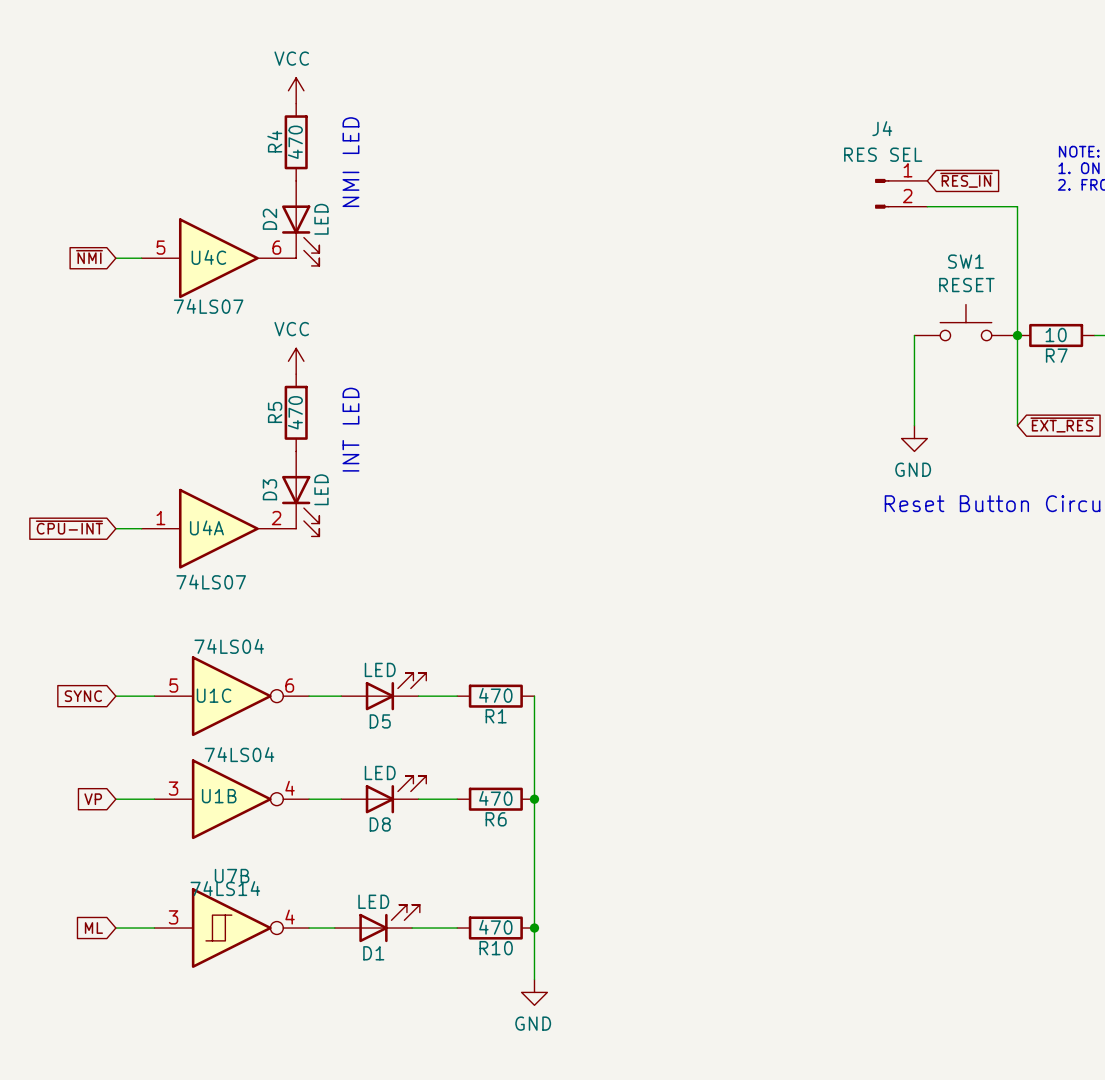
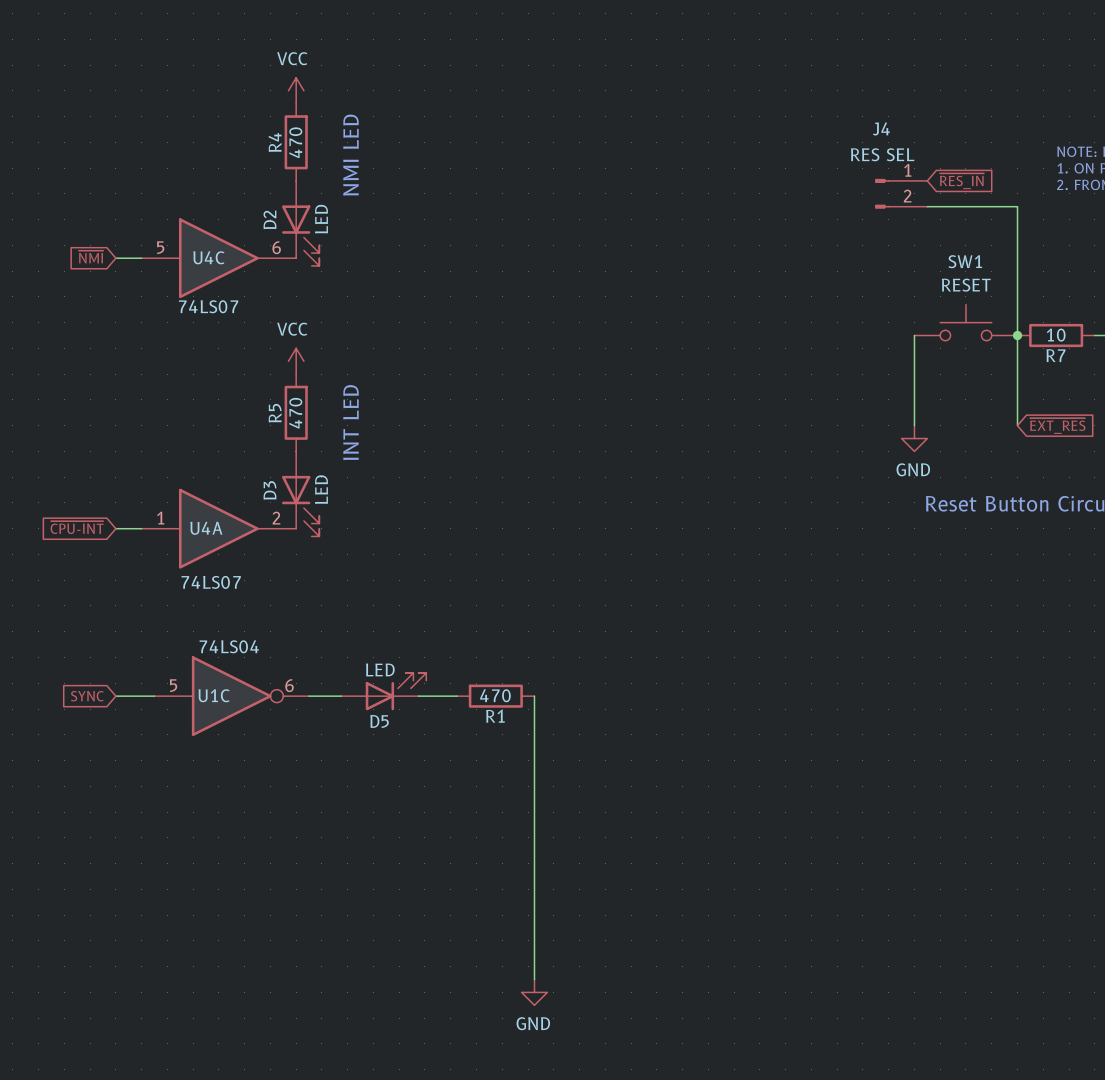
D8: LED (383, 794) -> none
global label: VP (93, 799) -> none
wire: (115, 799) (154, 799) -> none
U1B: 74LS04 (231, 799) -> none
wire: (309, 799) (341, 799) -> none
wire: (418, 799) (457, 799) -> none
R6: 470 (495, 799) -> none
junction: (534, 799) -> none
D1: LED (377, 923) -> none
global label: ML (93, 928) -> none
wire: (115, 928) (154, 928) -> none
U7B: 74LS14 (231, 928) -> none
wire: (309, 928) (334, 928) -> none
wire: (412, 928) (457, 928) -> none
R10: 470 (495, 928) -> none
junction: (534, 928) -> none

